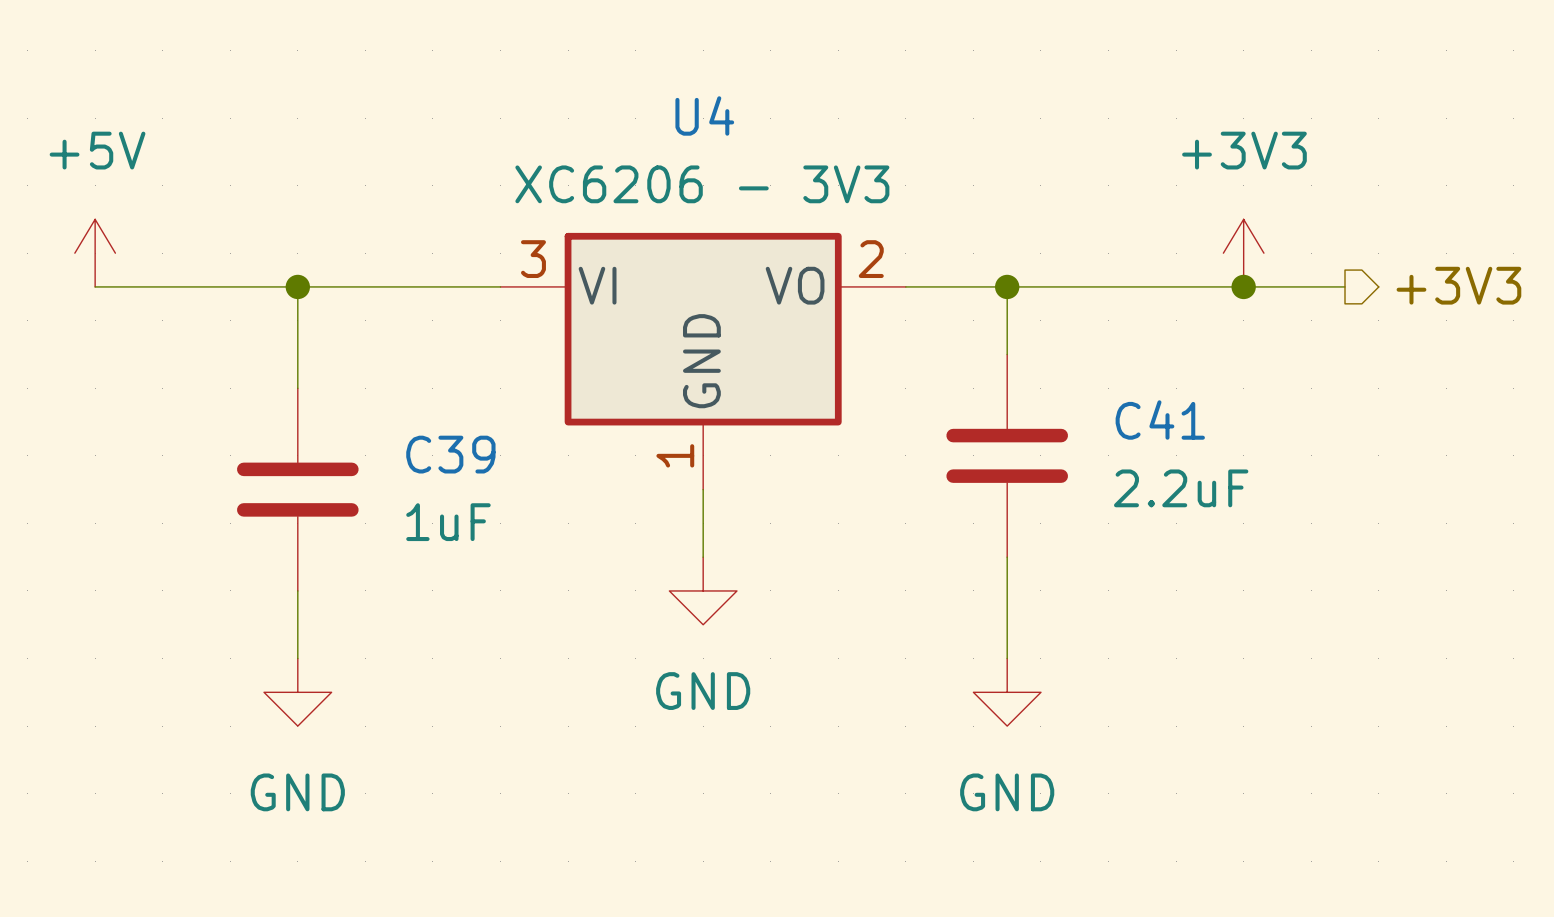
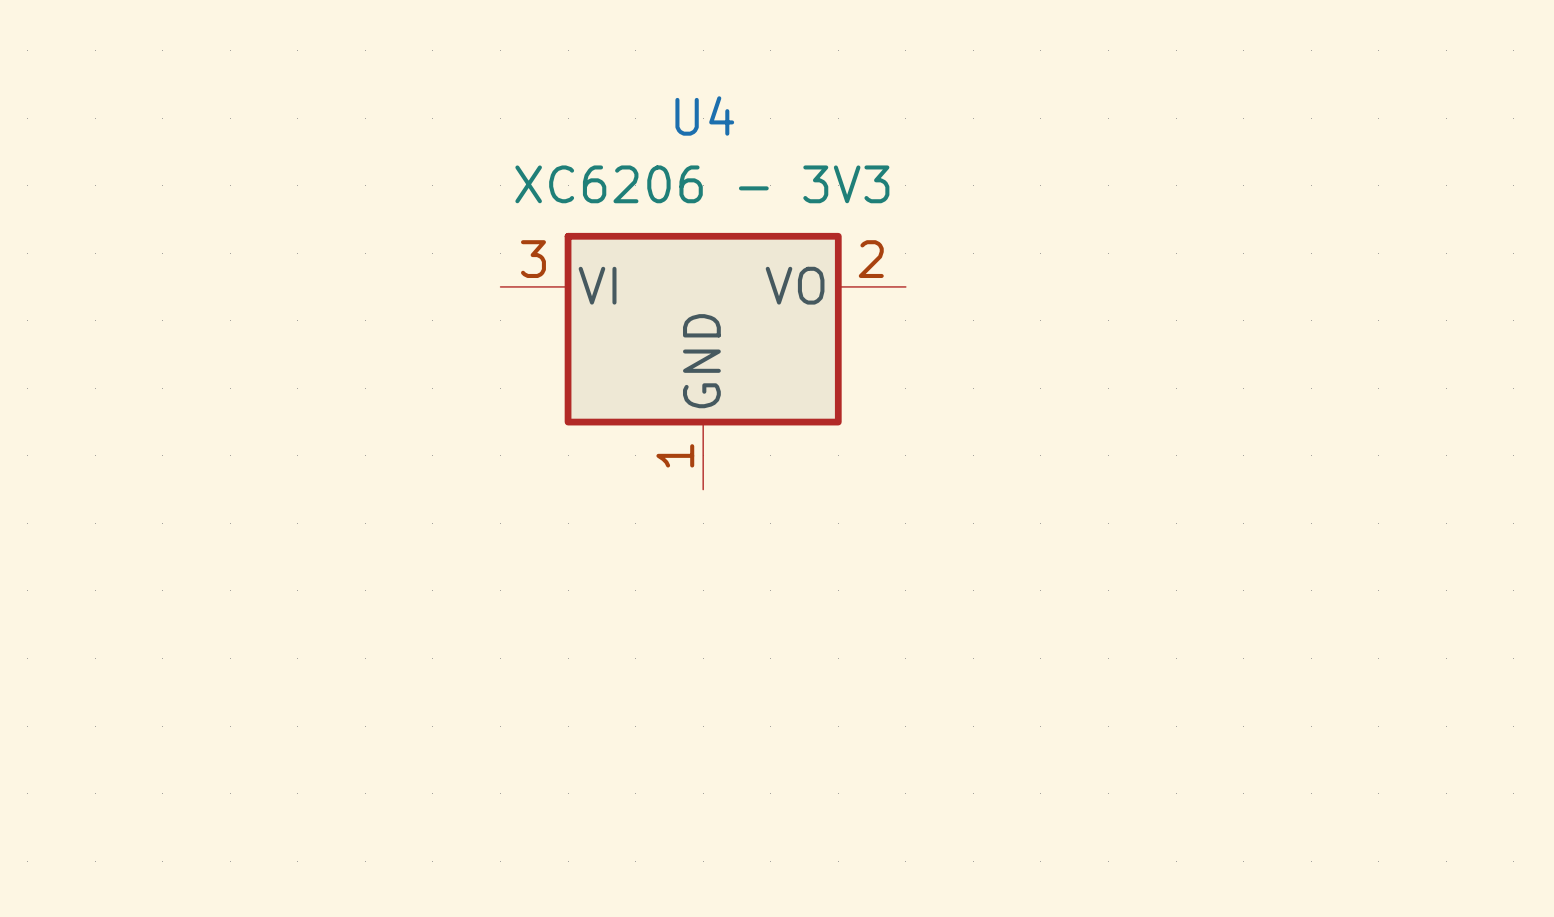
power symbol: +5V (95, 253) -> none
power symbol: +3V3 (1243, 253) -> none
hierarchical label: +3V3 (1458, 285) -> none
wire: (95, 286) (500, 286) -> none
wire: (297, 286) (297, 388) -> none
junction: (297, 286) -> none
wire: (905, 286) (1345, 286) -> none
wire: (1007, 286) (1007, 354) -> none
junction: (1007, 286) -> none
junction: (1243, 286) -> none
C41: 2.2uF (1007, 455) -> none
C39: 1uF (297, 489) -> none
wire: (703, 489) (703, 557) -> none
wire: (1007, 557) (1007, 658) -> none
wire: (297, 590) (297, 658) -> none
power symbol: GND (703, 590) -> none
power symbol: GND (297, 692) -> none
power symbol: GND (1007, 692) -> none

